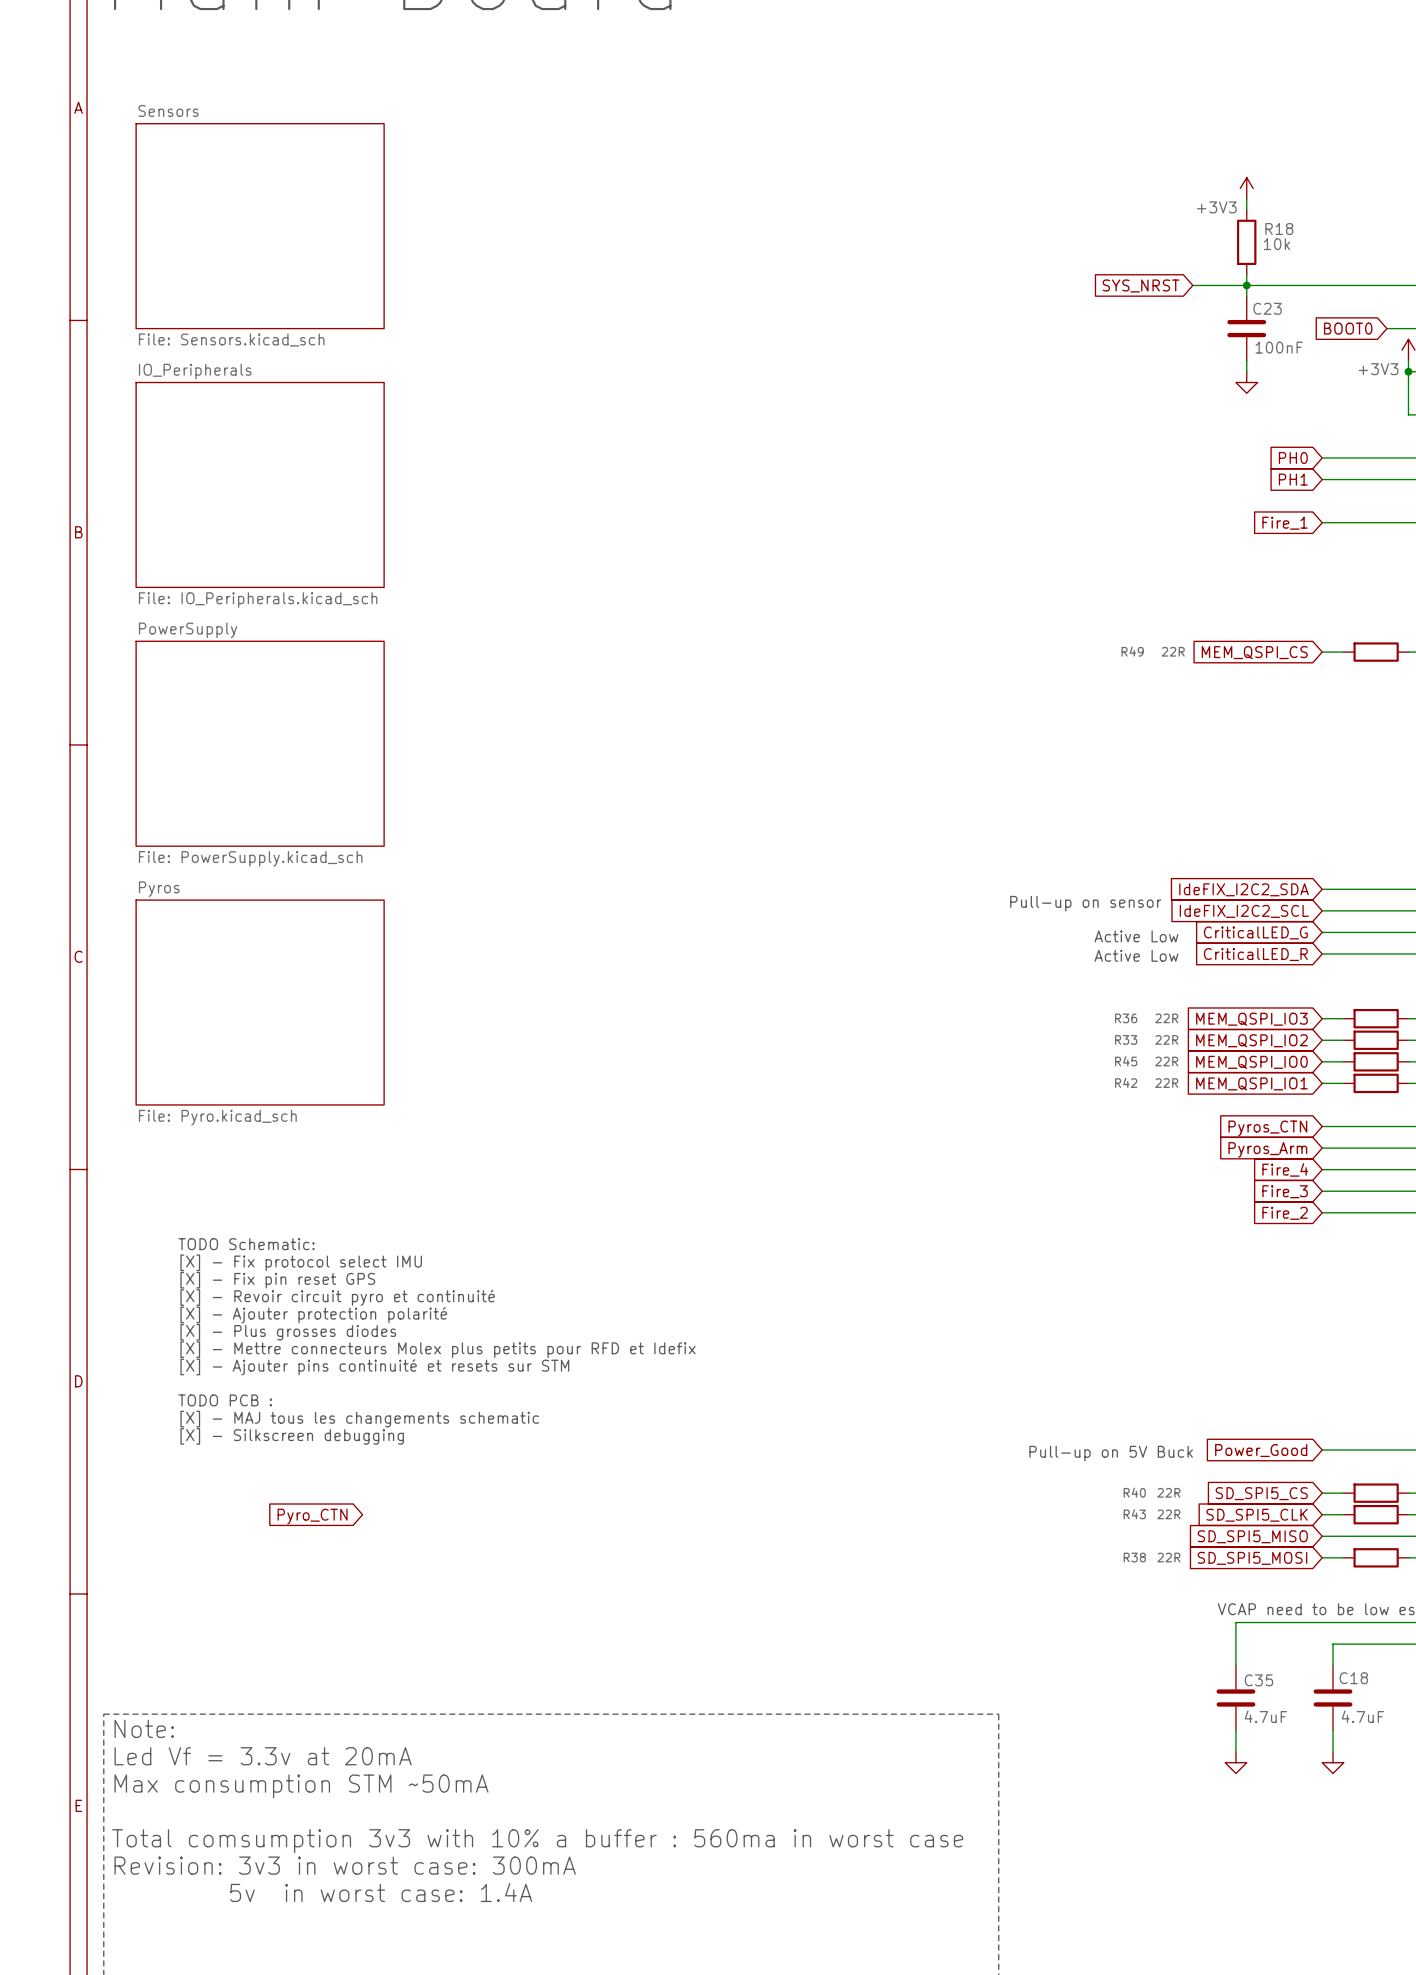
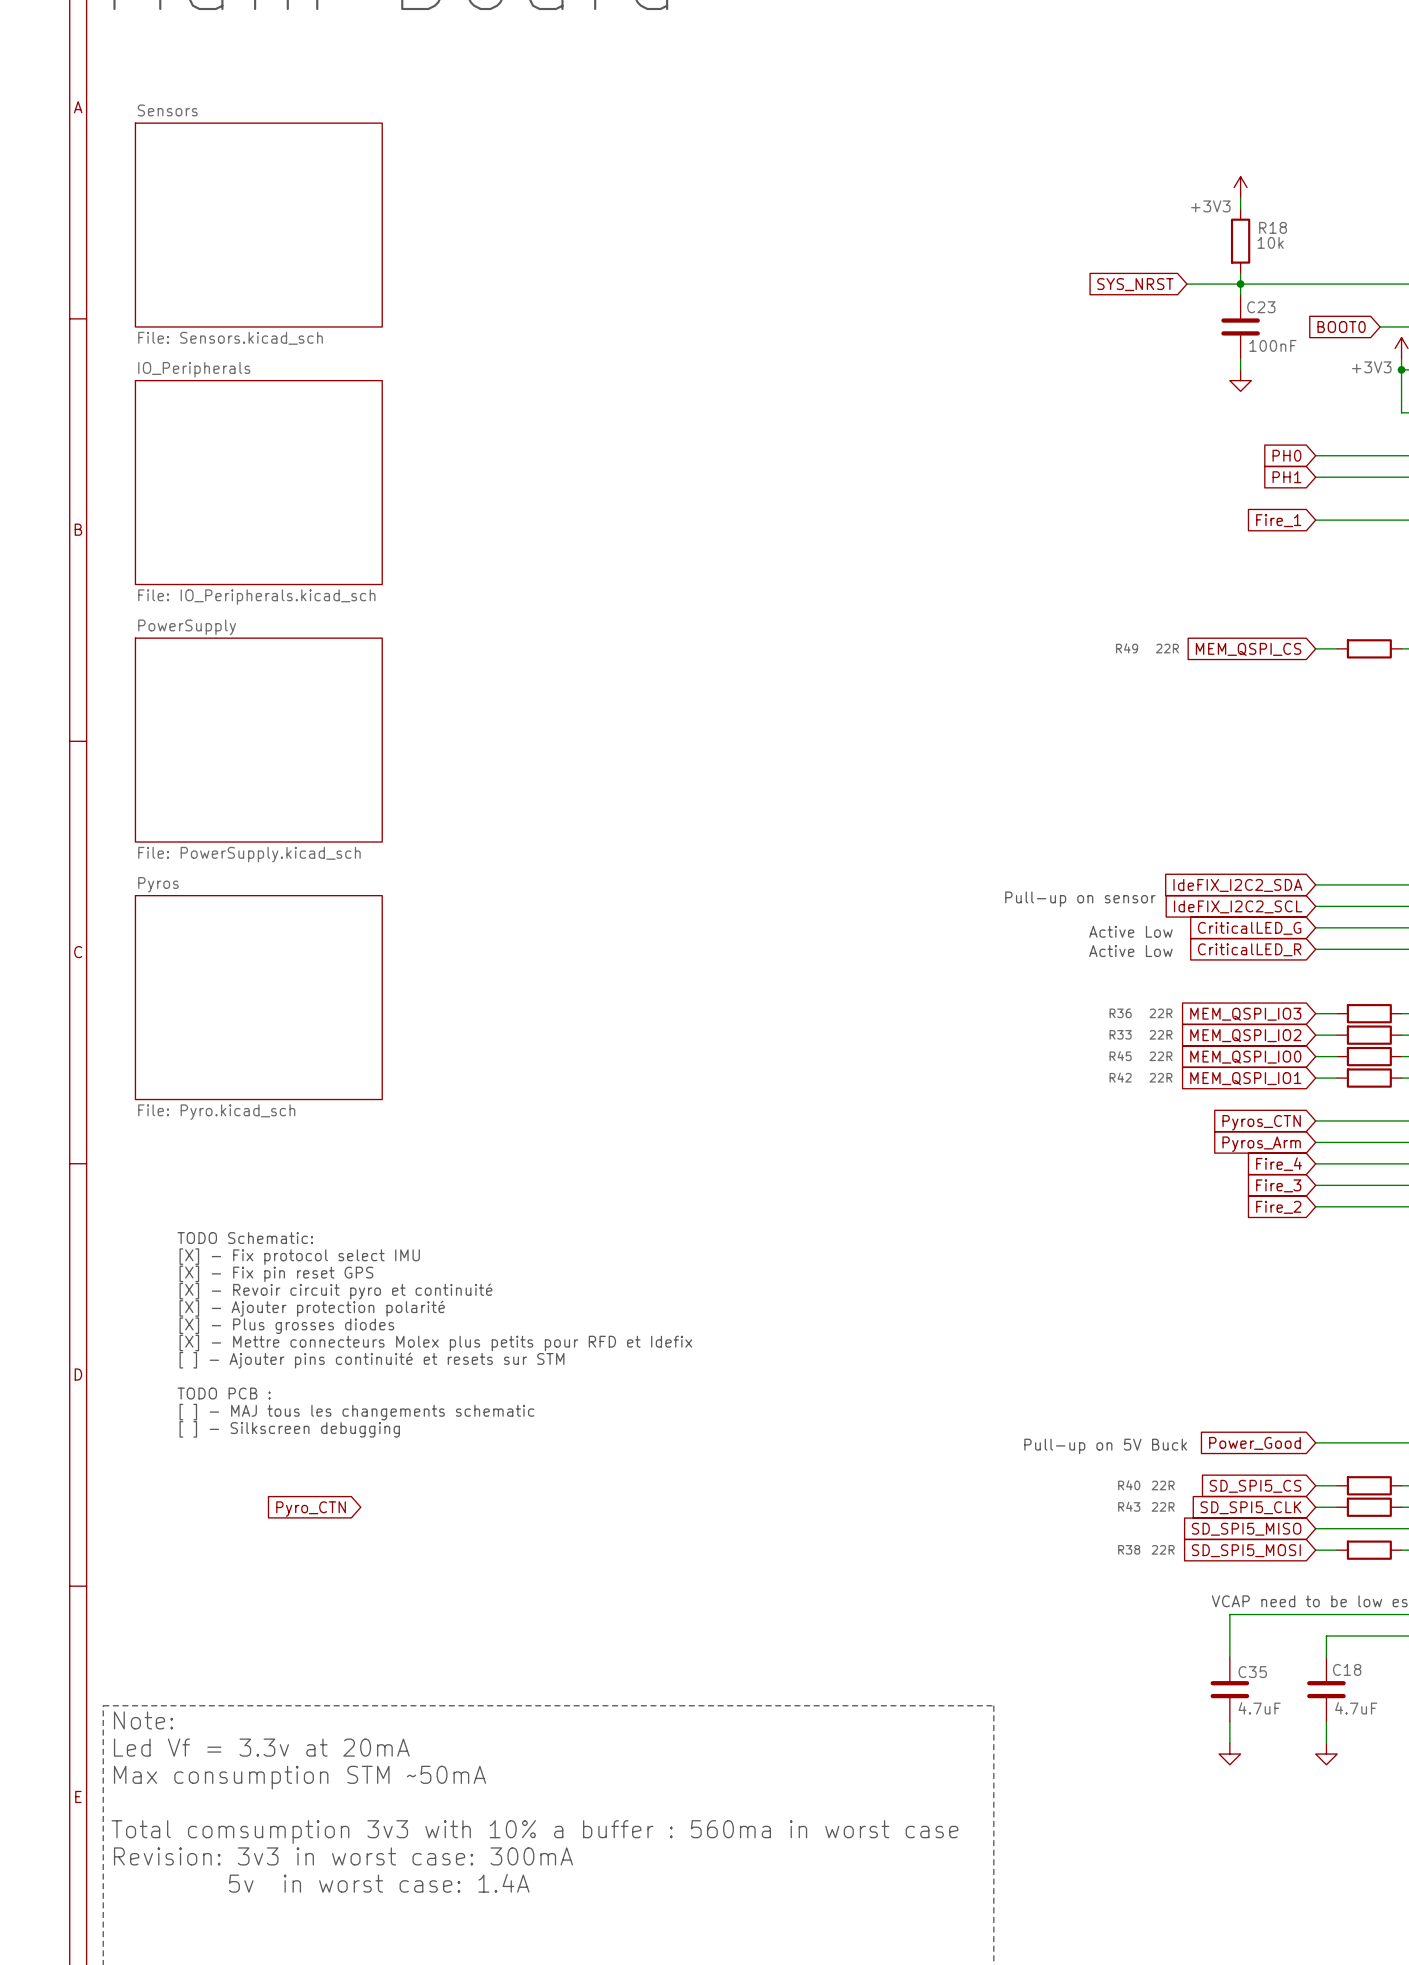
text: [X] - Ajouter pins continuité et resets sur STM (374, 1366) -> [ ] - Ajouter pins continuité et resets sur STM (371, 1360)
text: [X] - MAJ tous les changements schematic (359, 1419) -> [ ] - MAJ tous les changements schematic (356, 1412)
text: [X] - Silkscreen debugging (292, 1436) -> [ ] - Silkscreen debugging (289, 1429)

